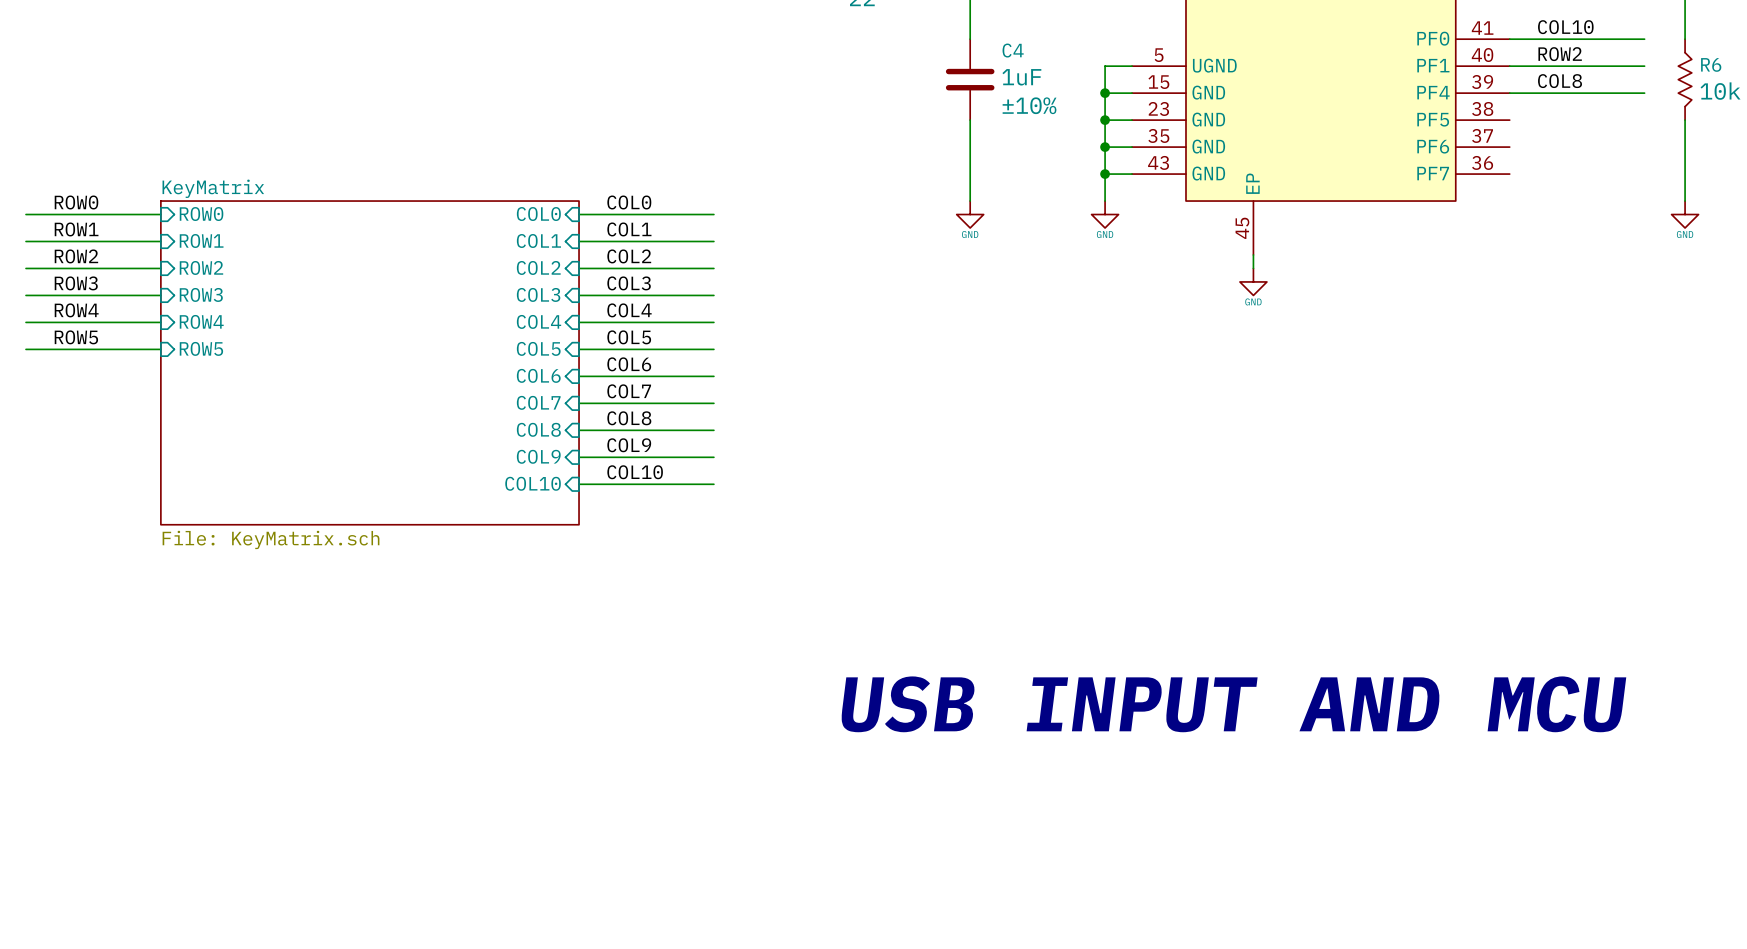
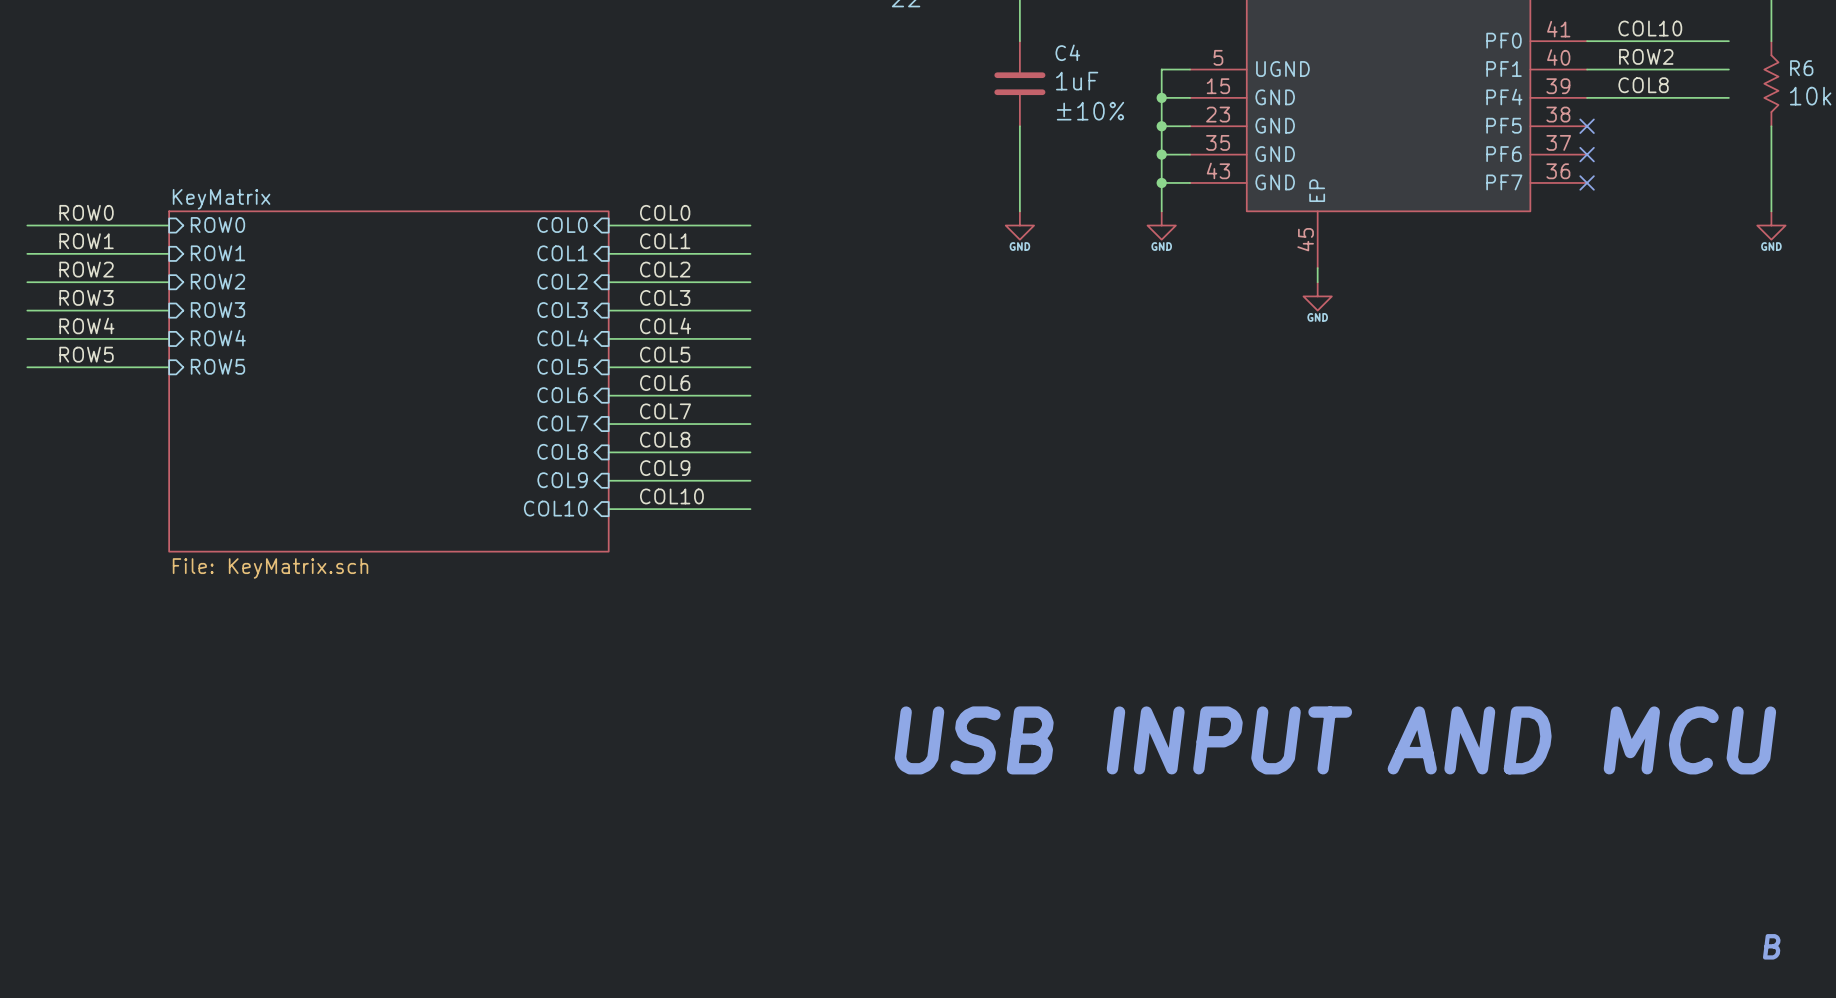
no-connect mark: none -> (1587, 126)
no-connect mark: none -> (1587, 154)
no-connect mark: none -> (1587, 182)
text: none -> B (1771, 946)

